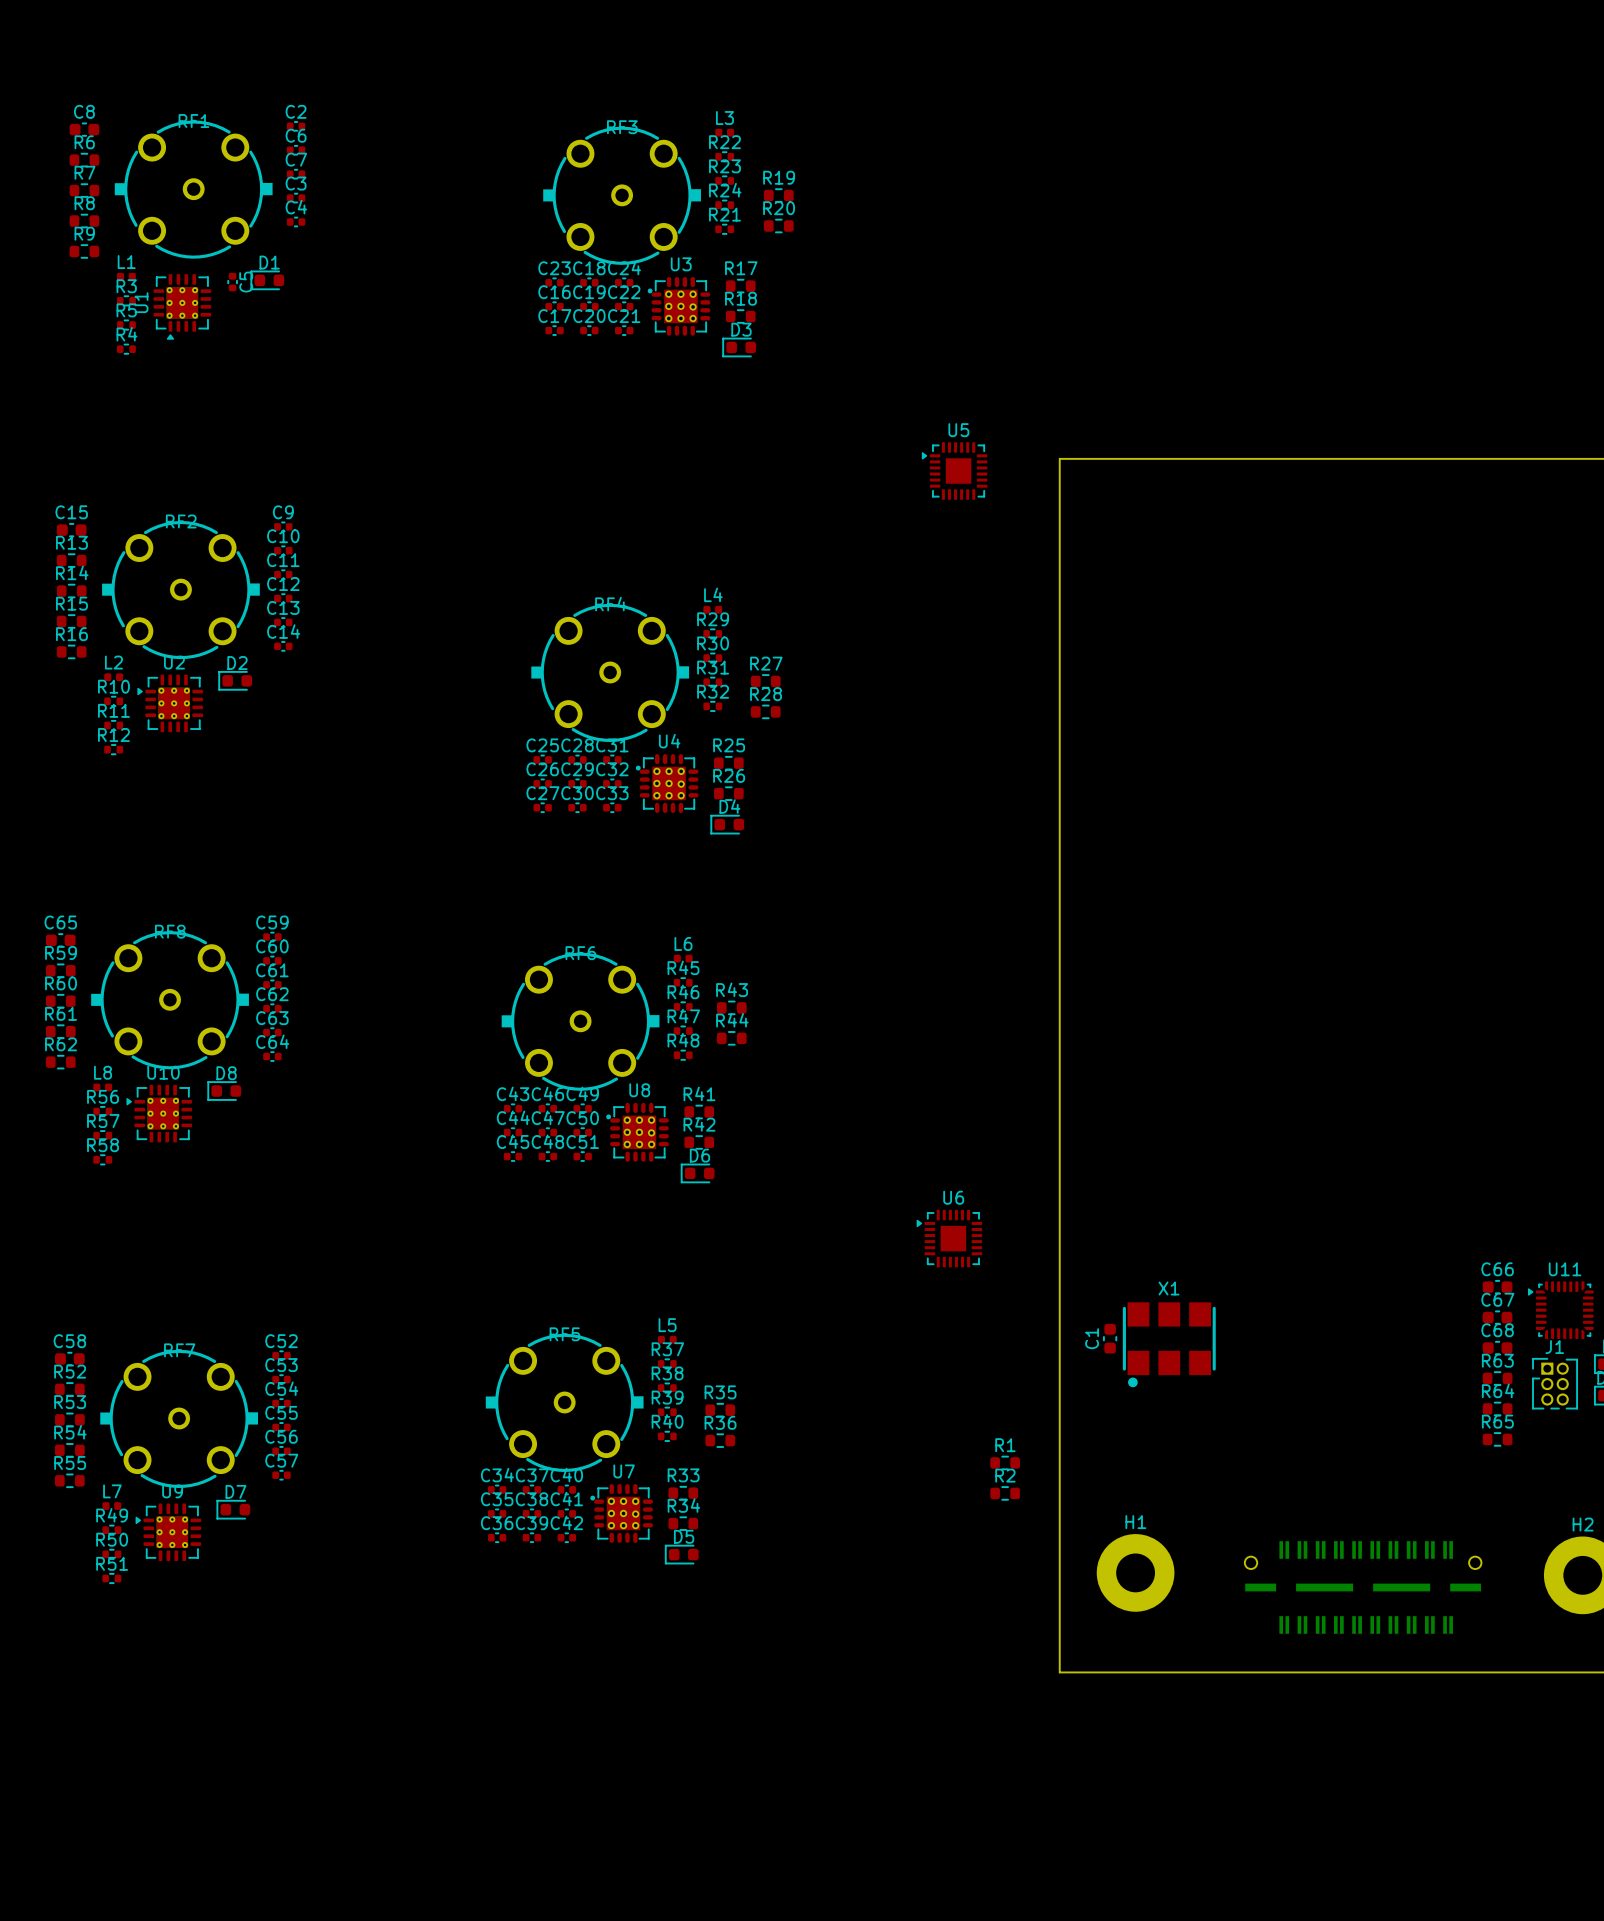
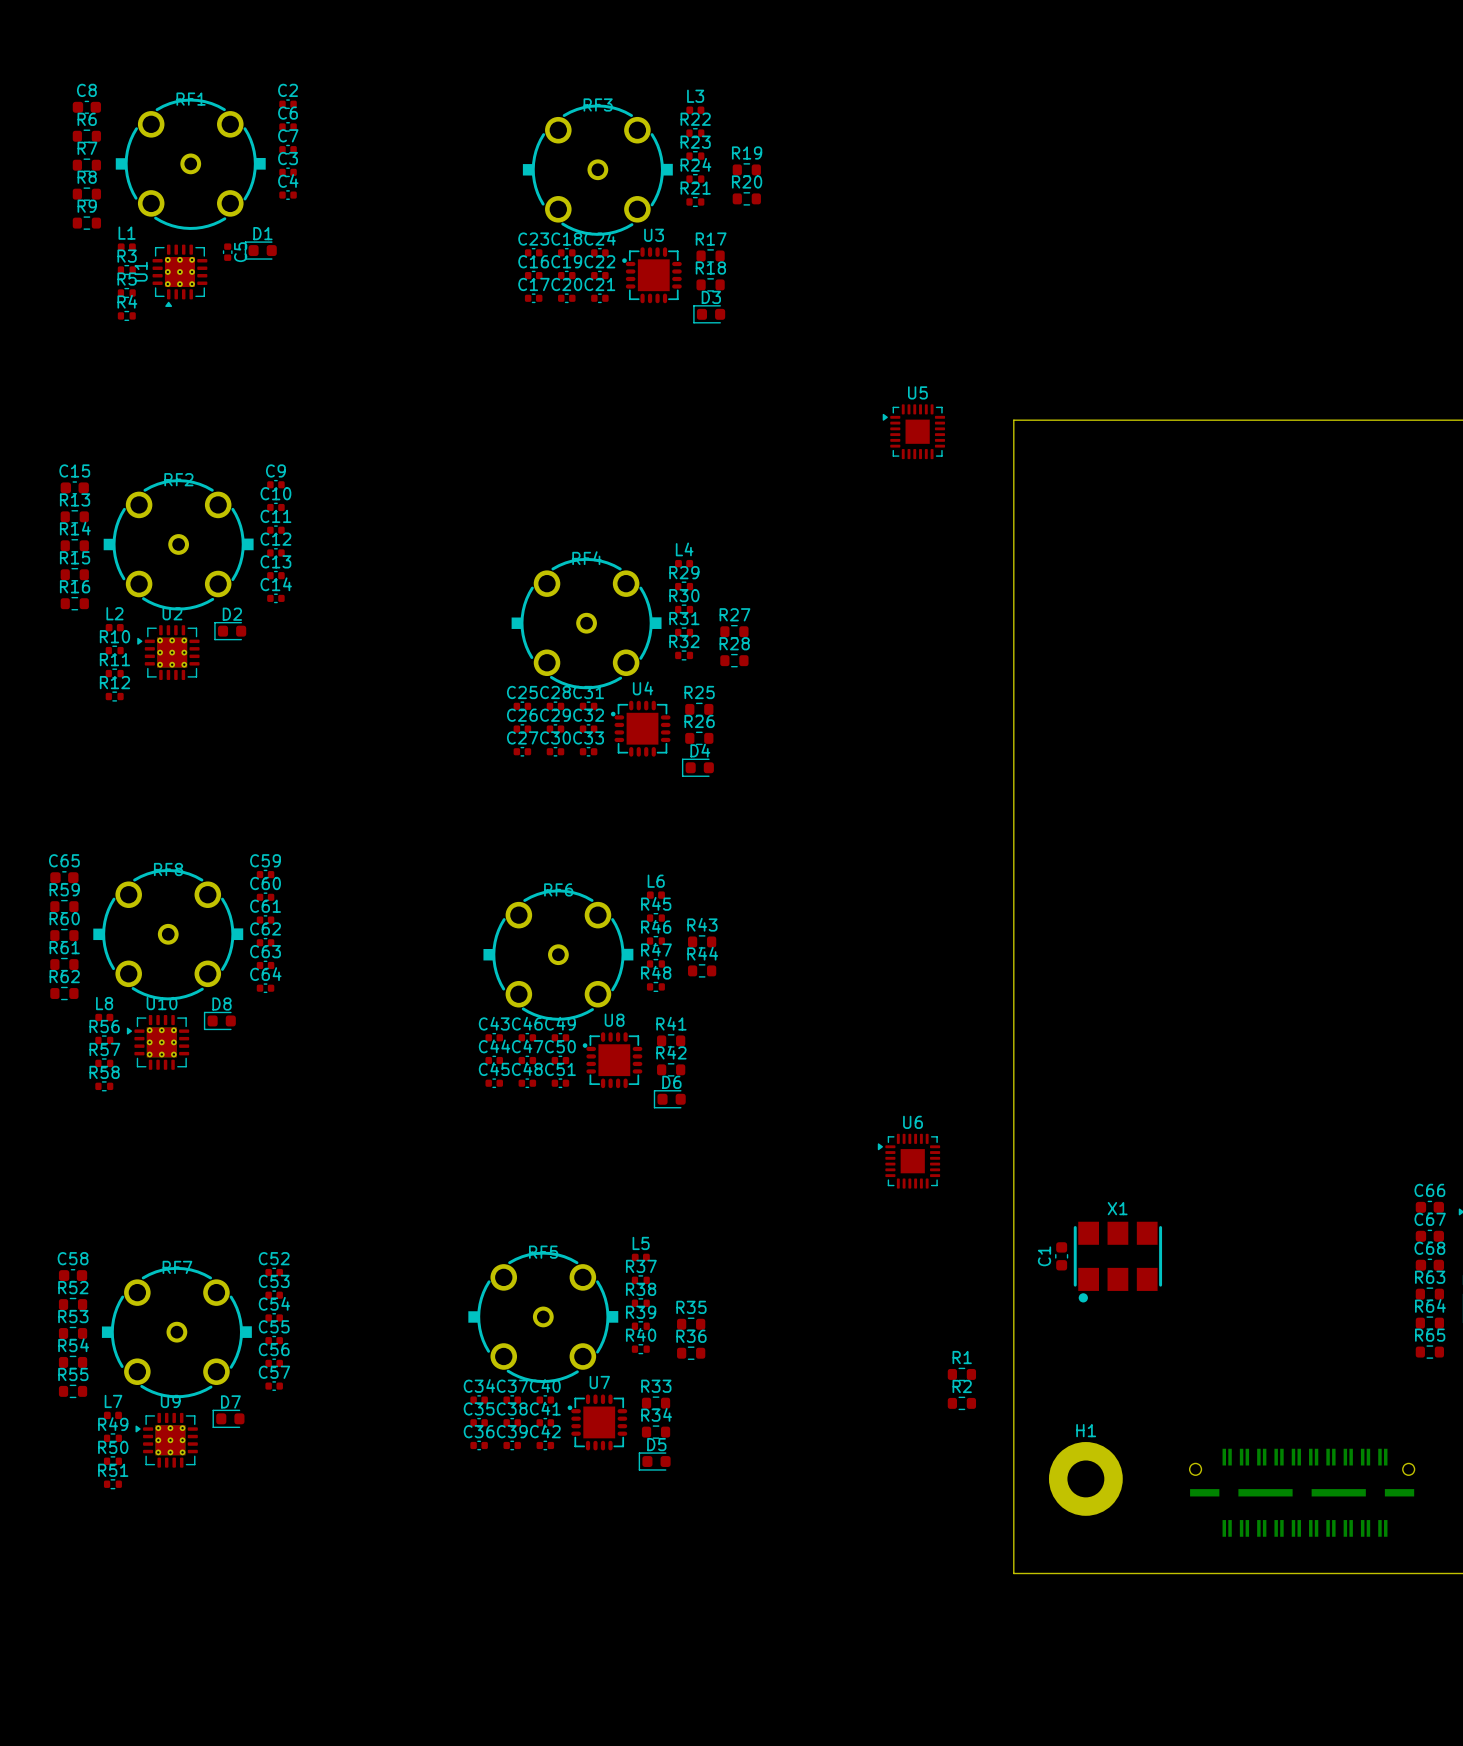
U3 footprint: [647, 276, 711, 336] -> [622, 247, 682, 304]
U4 footprint: [635, 754, 699, 813] -> [610, 700, 671, 757]
U8 footprint: [606, 1102, 669, 1162] -> [582, 1032, 643, 1089]
U7 footprint: [590, 1484, 653, 1543] -> [567, 1394, 628, 1451]

